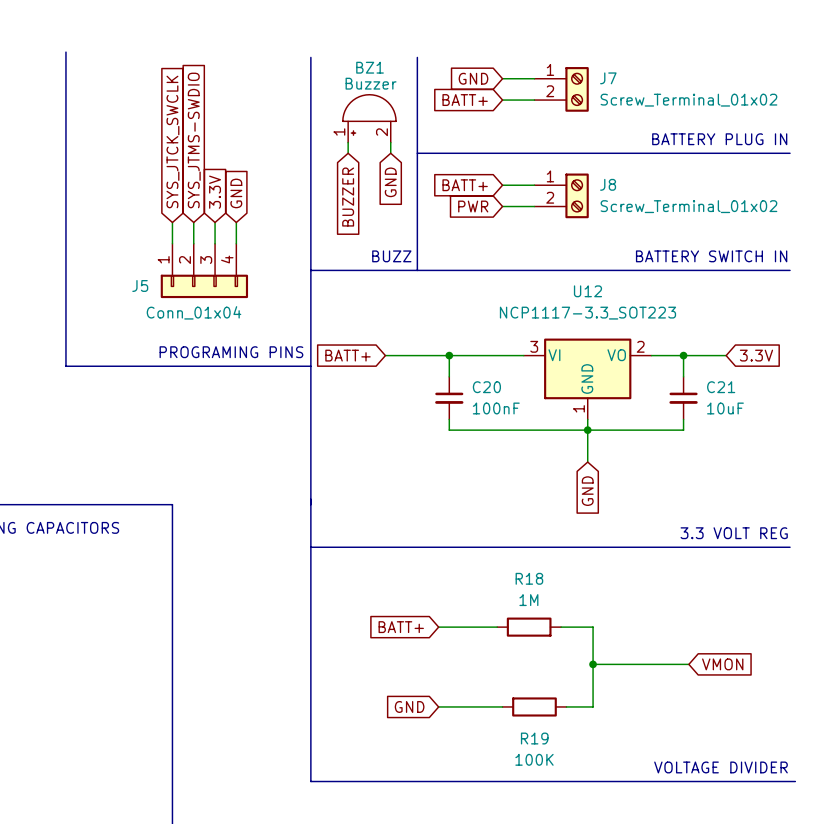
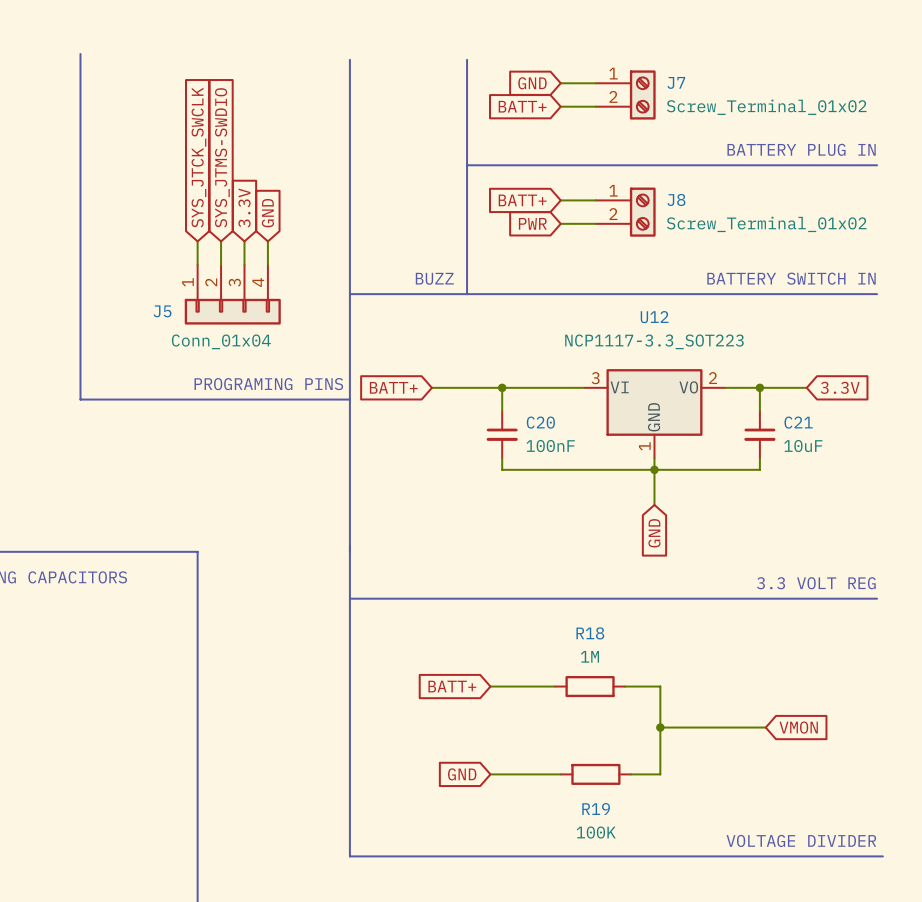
BZ1: Buzzer (369, 118) -> none
wire: (348, 142) (348, 153) -> none
wire: (390, 142) (390, 153) -> none
global label: GND (390, 182) -> none
global label: BUZZER (348, 197) -> none

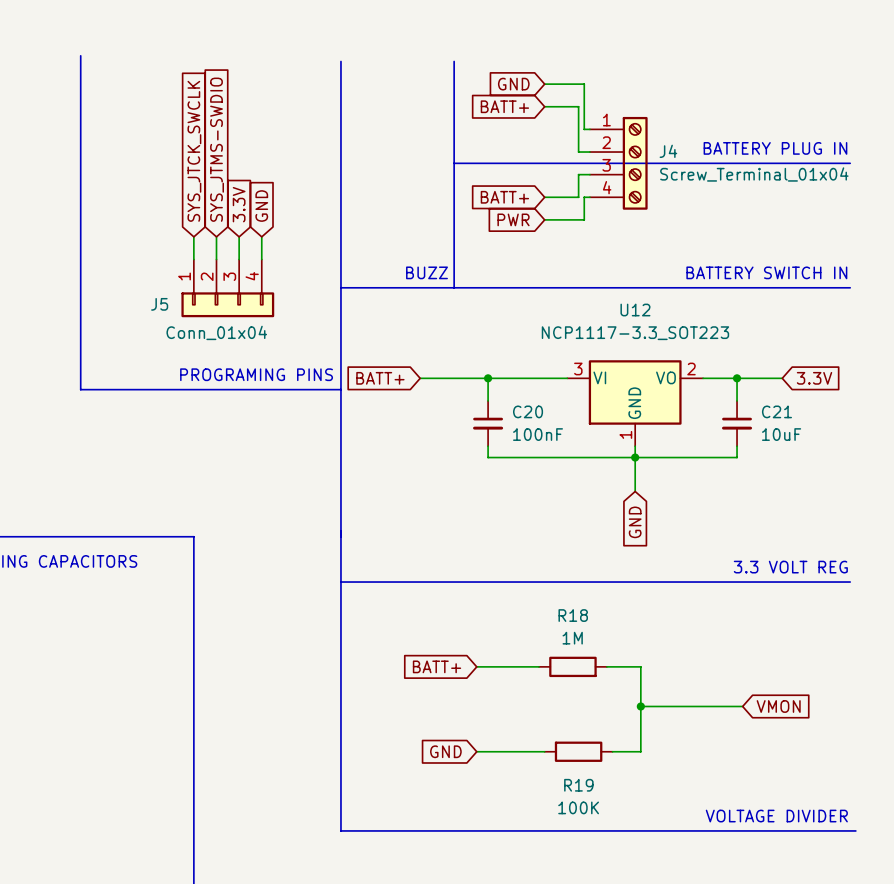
wire: none -> (578, 84) (584, 84) (584, 129) (589, 129)
J7: Screw_Terminal_01x02 (625, 94) -> none
wire: none -> (578, 106) (578, 152) (589, 152)
J4: none -> Screw_Terminal_01x04 (618, 163)
wire: none -> (589, 174) (578, 174) (578, 197)
wire: none -> (589, 197) (584, 197) (584, 219) (578, 219)
J8: Screw_Terminal_01x02 (625, 212) -> none

